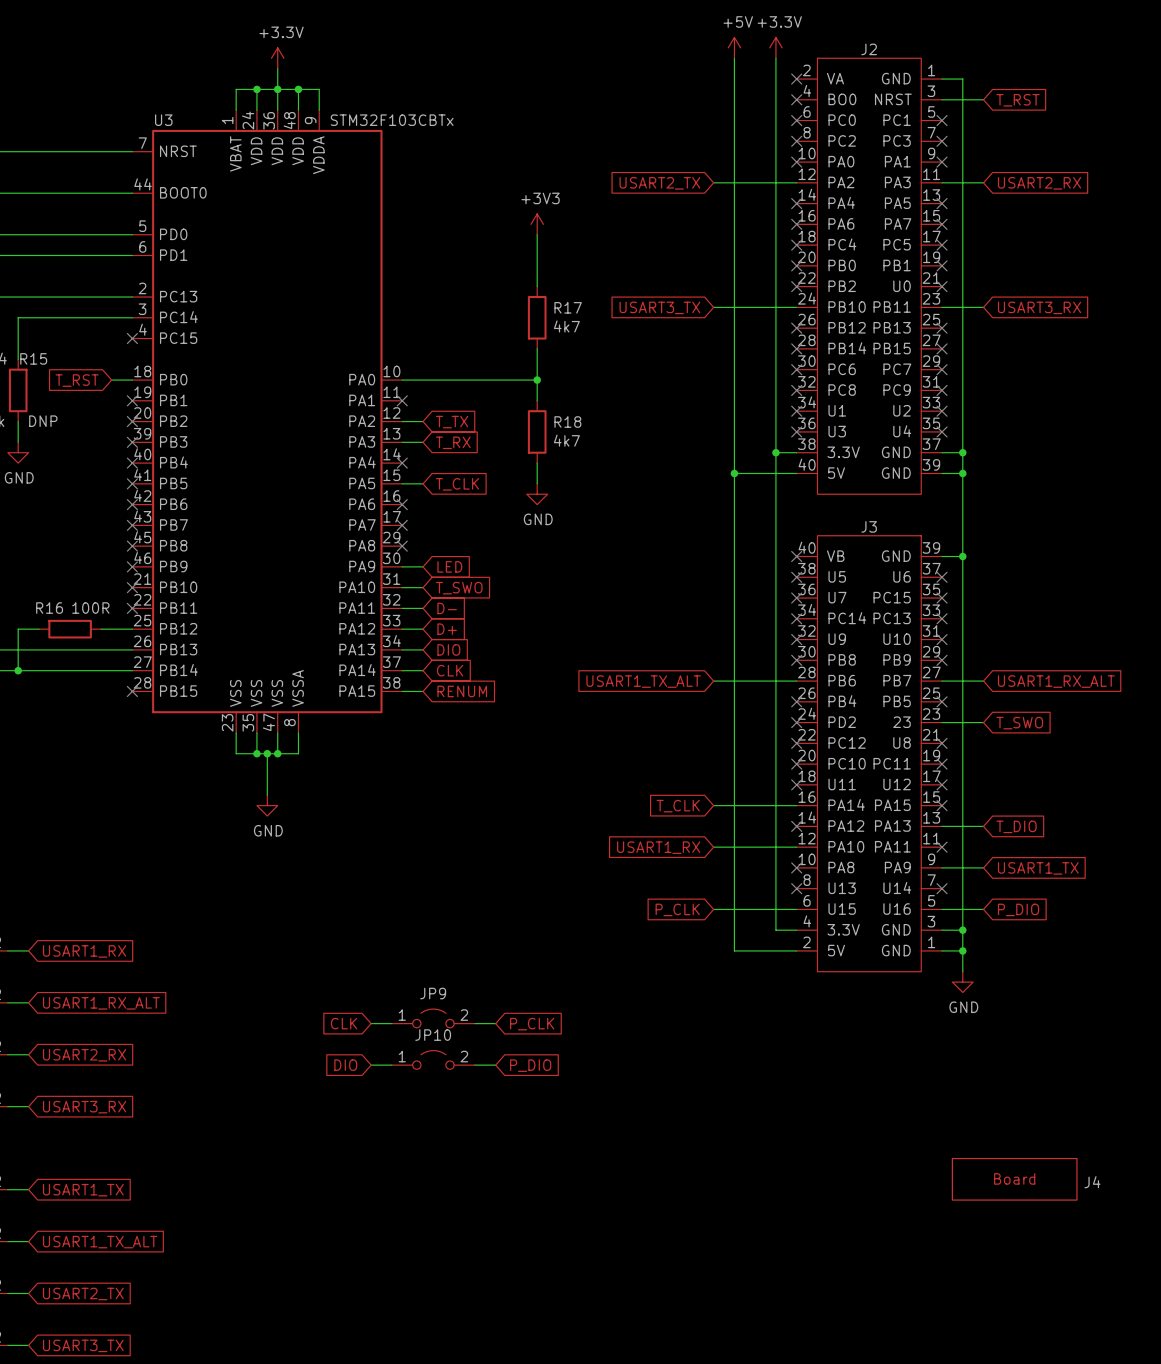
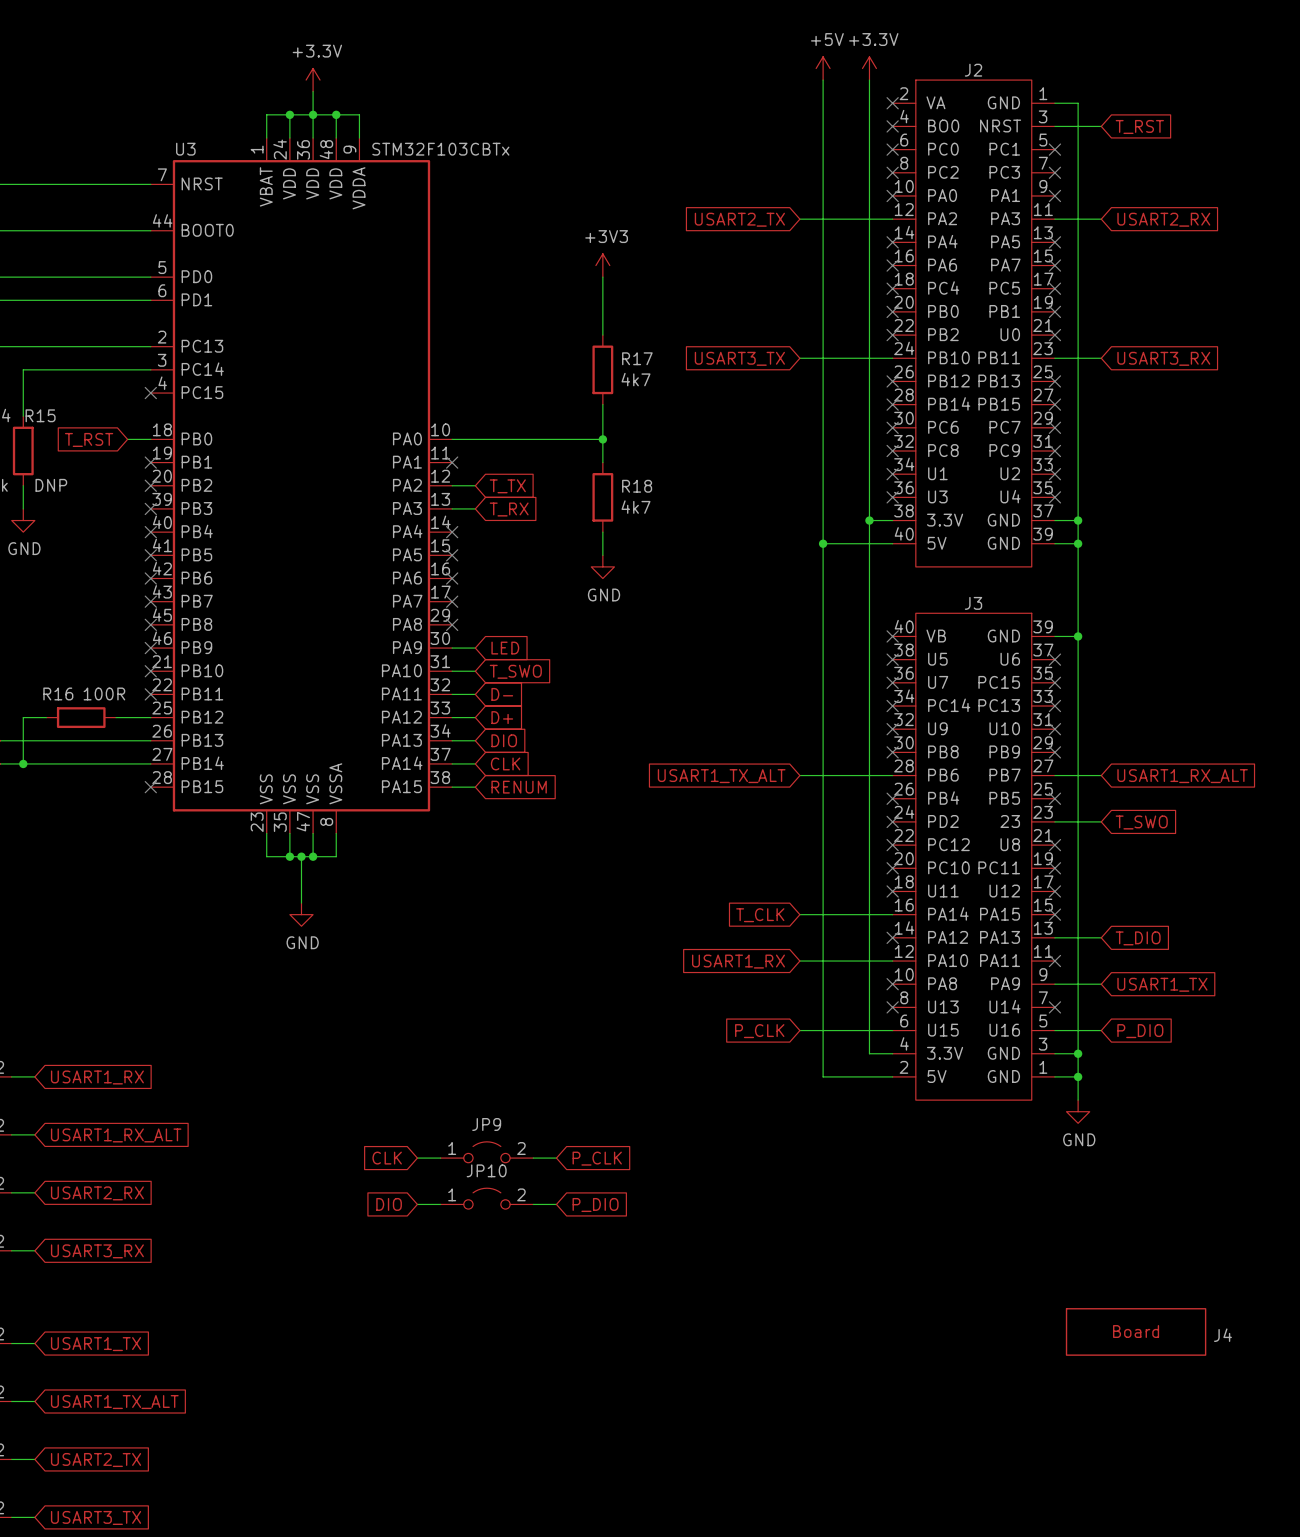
wire: (402, 483) (423, 483) -> none
no-connect mark: none -> (452, 555)
global label: T_CLK (457, 484) -> none

